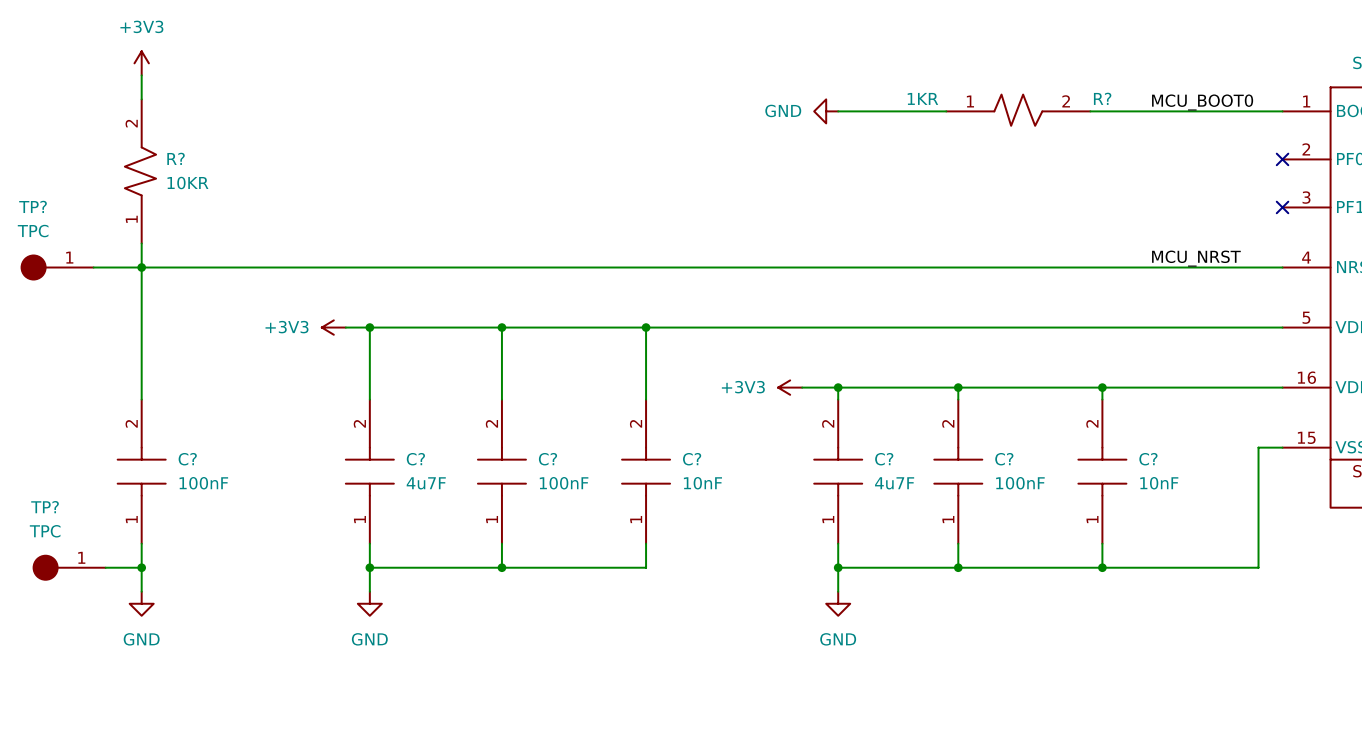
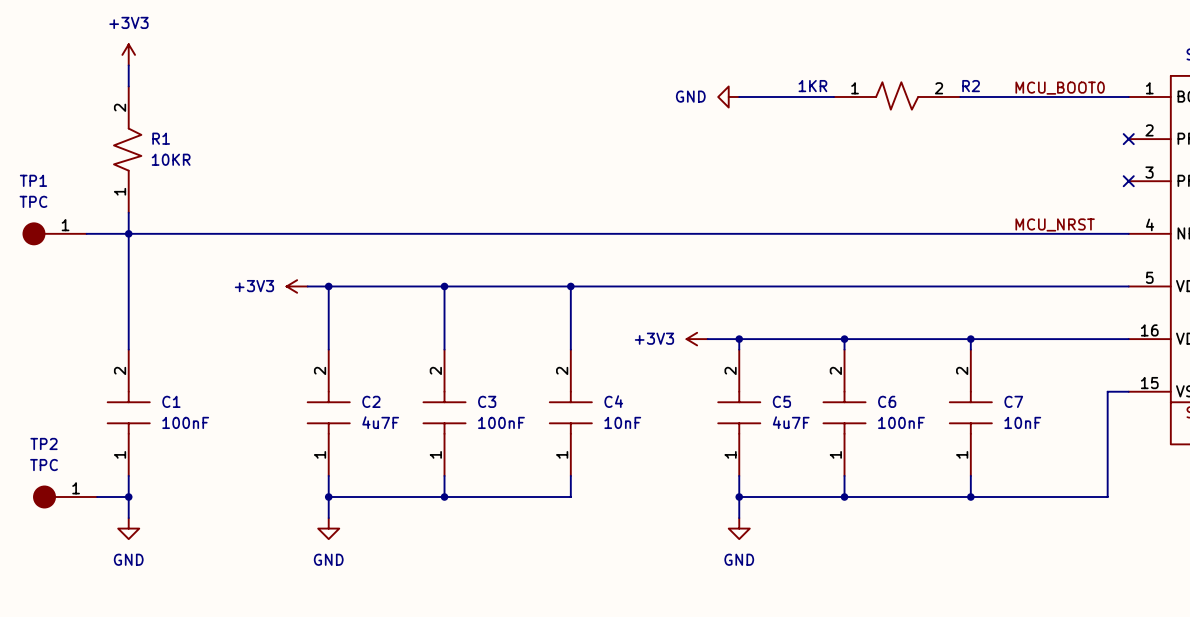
R? name: R? (1102, 98) -> R2 (971, 86)
R? name: R? (176, 158) -> R1 (161, 138)
TP? name: TP? (33, 206) -> TP1 (33, 180)
C? name: C? (187, 459) -> C1 (171, 401)
C? name: C? (415, 459) -> C2 (371, 401)
C? name: C? (547, 459) -> C3 (487, 401)
C? name: C? (692, 459) -> C4 (613, 401)
C? name: C? (884, 459) -> C5 (781, 401)
C? name: C? (1004, 459) -> C6 (887, 401)
C? name: C? (1148, 459) -> C7 (1013, 401)
TP? name: TP? (45, 507) -> TP2 (44, 443)

